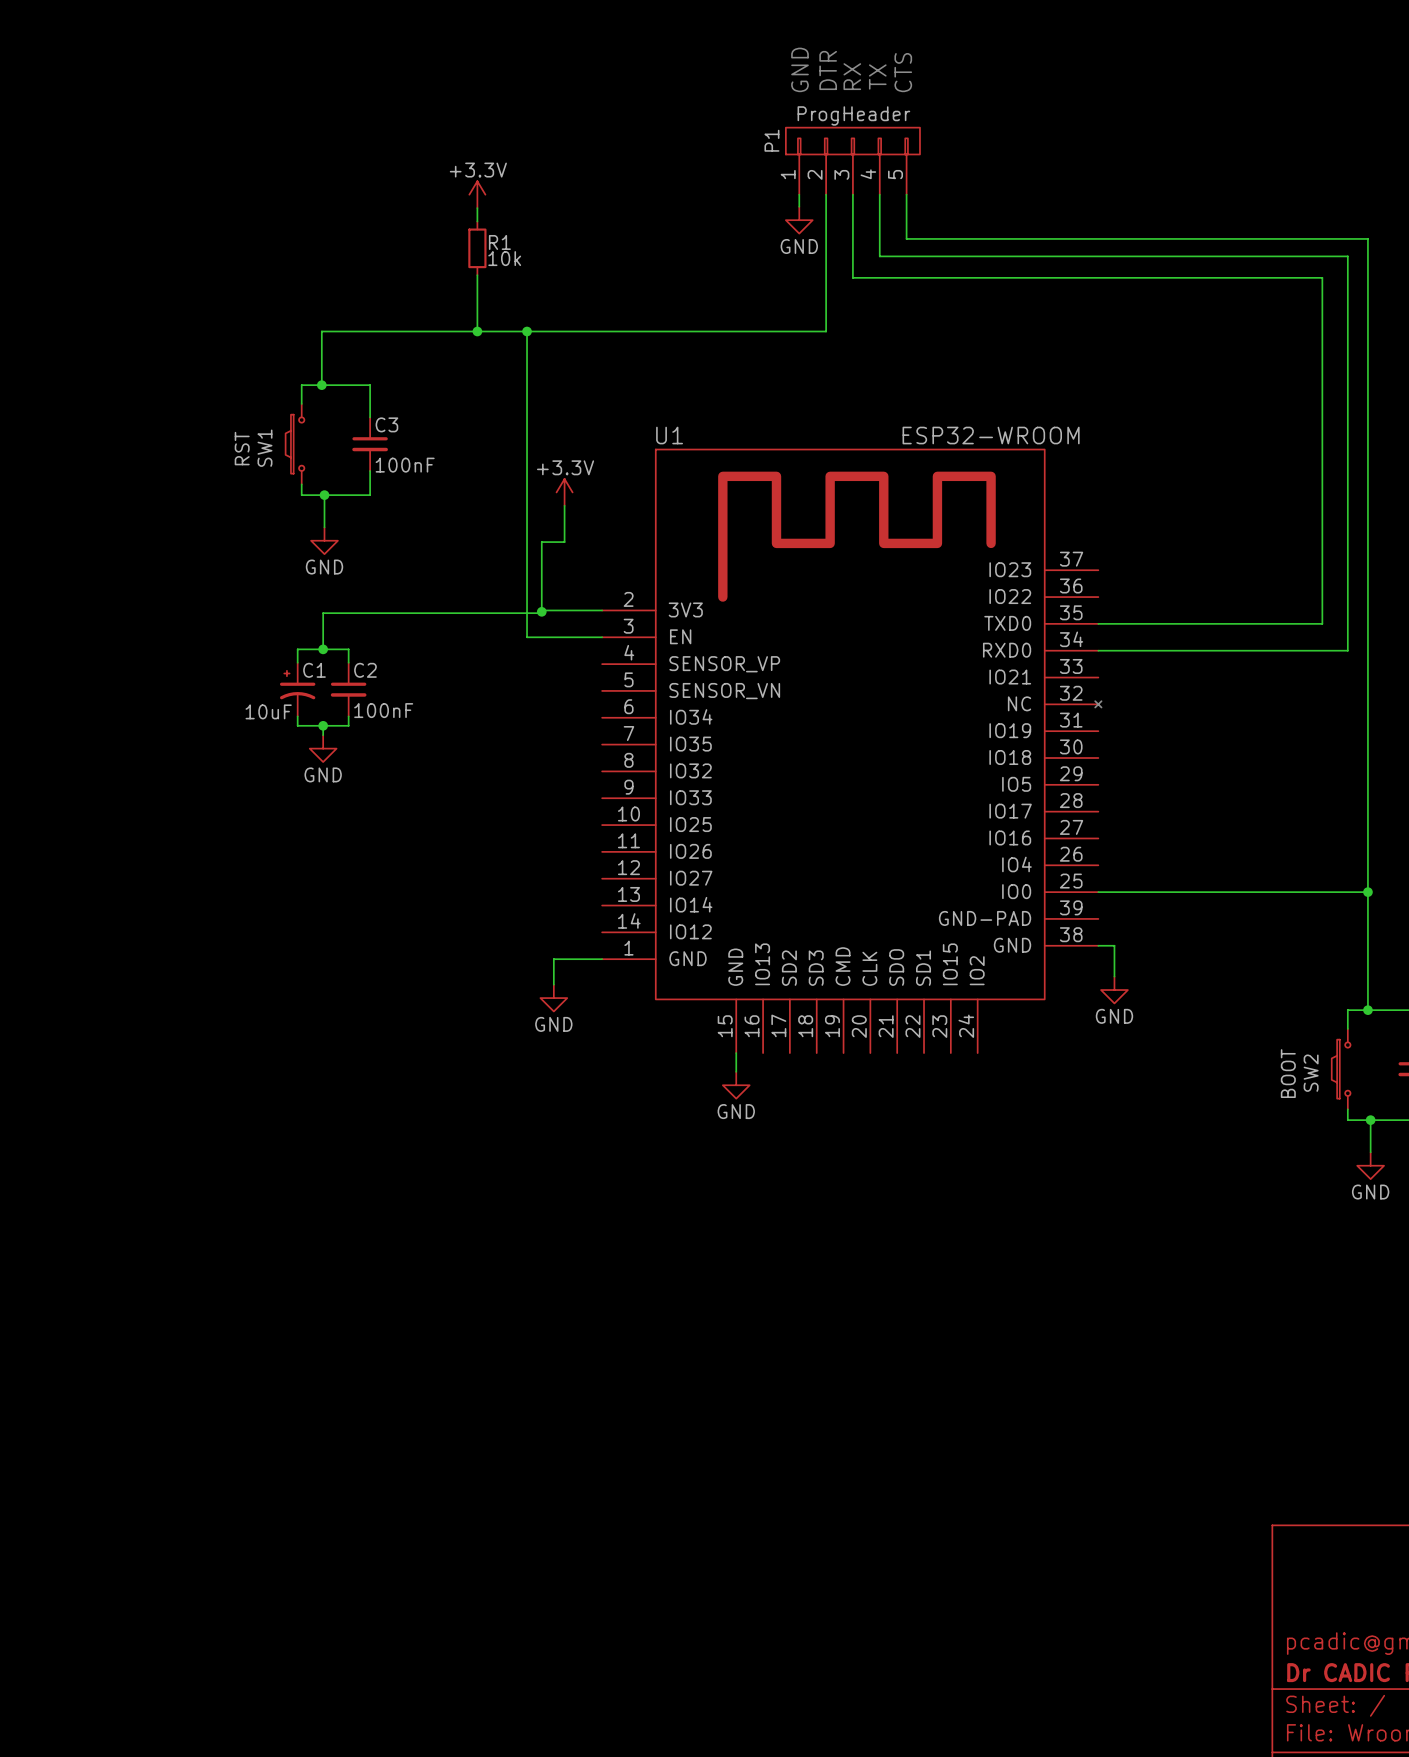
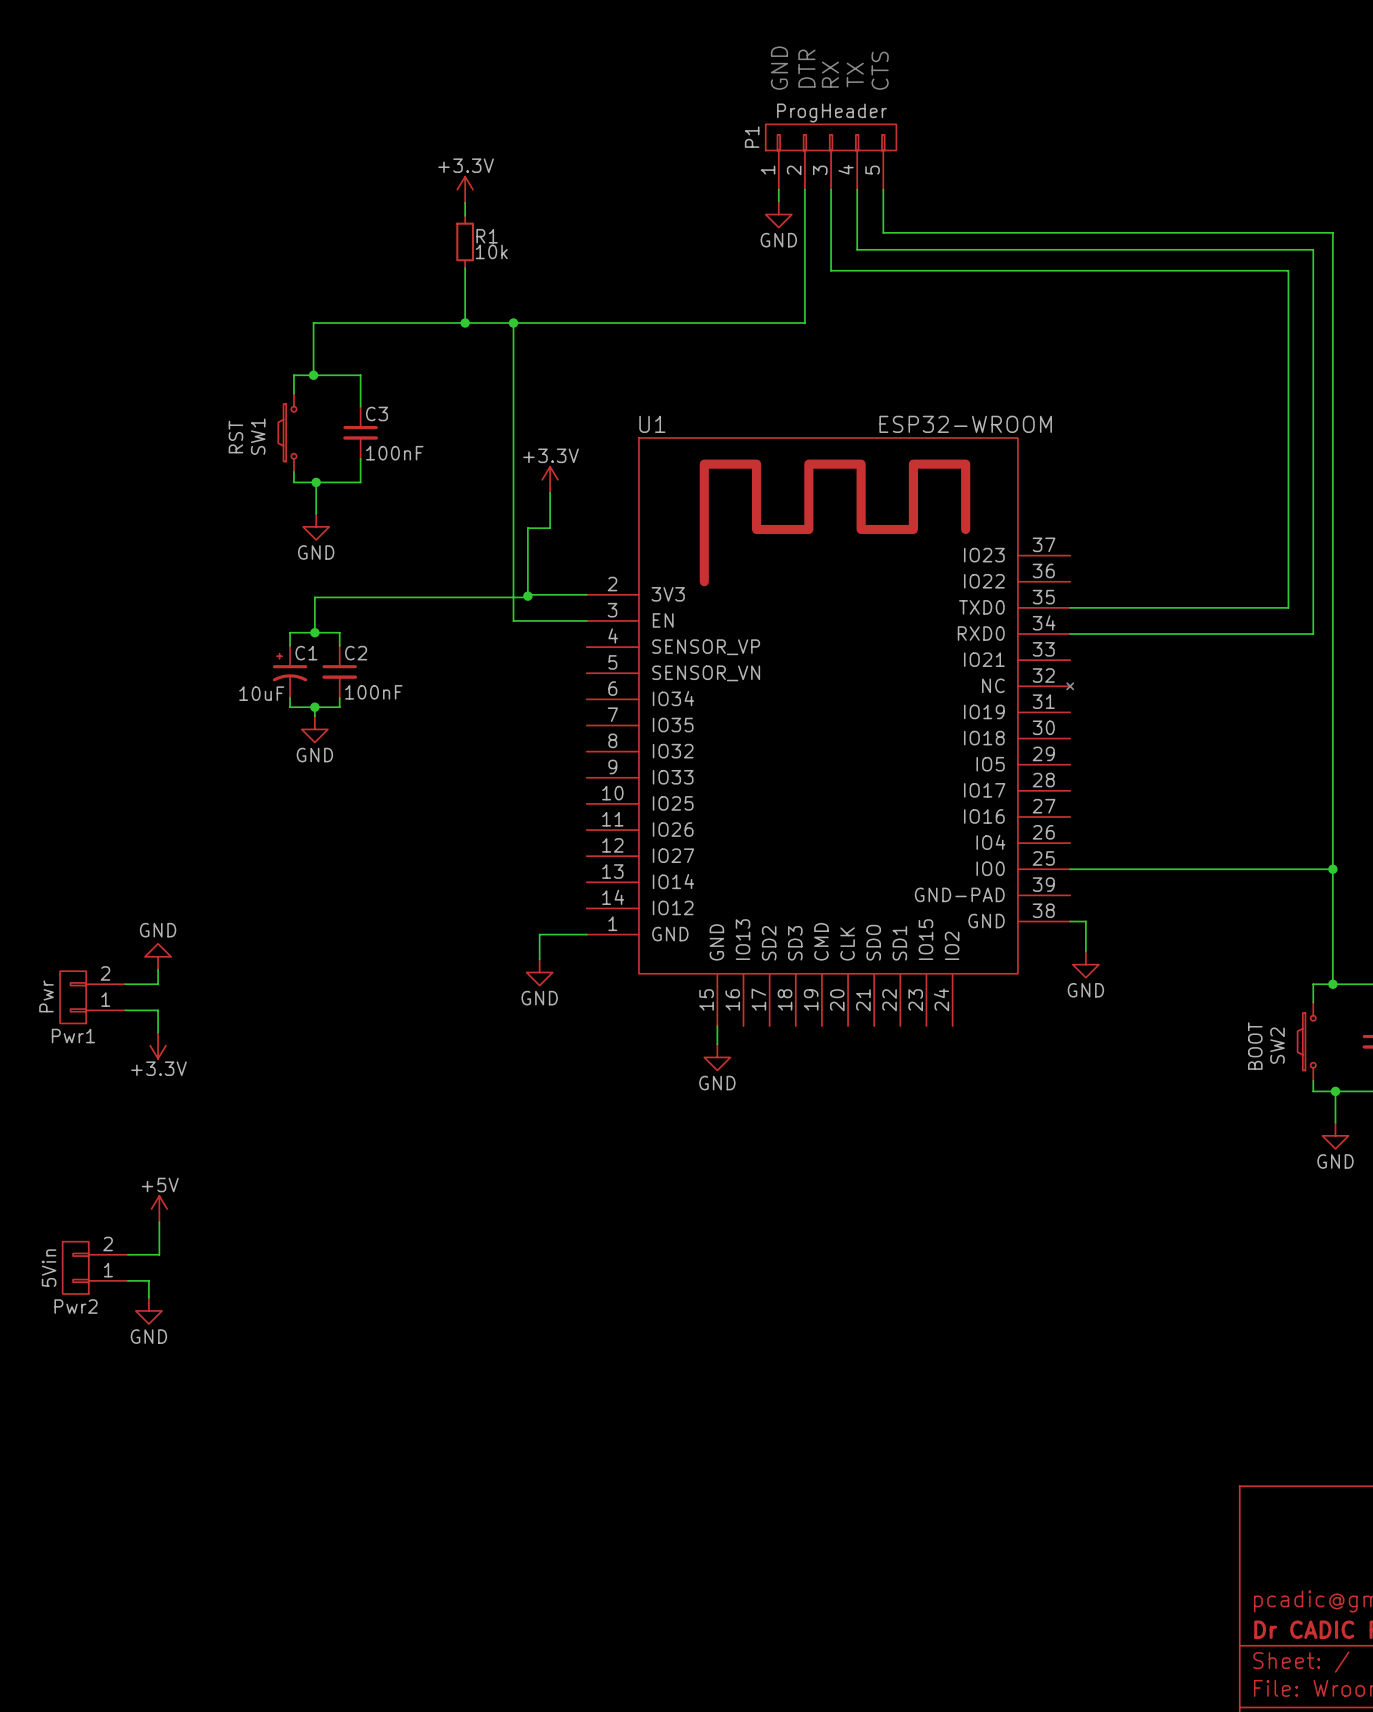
power symbol: none -> GND (158, 956)
wire: none -> (158, 969) (158, 984) (125, 984)
Pwr1: none -> Pwr (92, 997)
wire: none -> (125, 1010) (158, 1010) (158, 1032)
power symbol: none -> +3.3V (158, 1045)
power symbol: none -> +5V (159, 1209)
wire: none -> (159, 1222) (159, 1254) (128, 1254)
Pwr2: none -> 5Vin (95, 1267)
wire: none -> (128, 1280) (148, 1280) (148, 1297)
power symbol: none -> GND (148, 1310)

